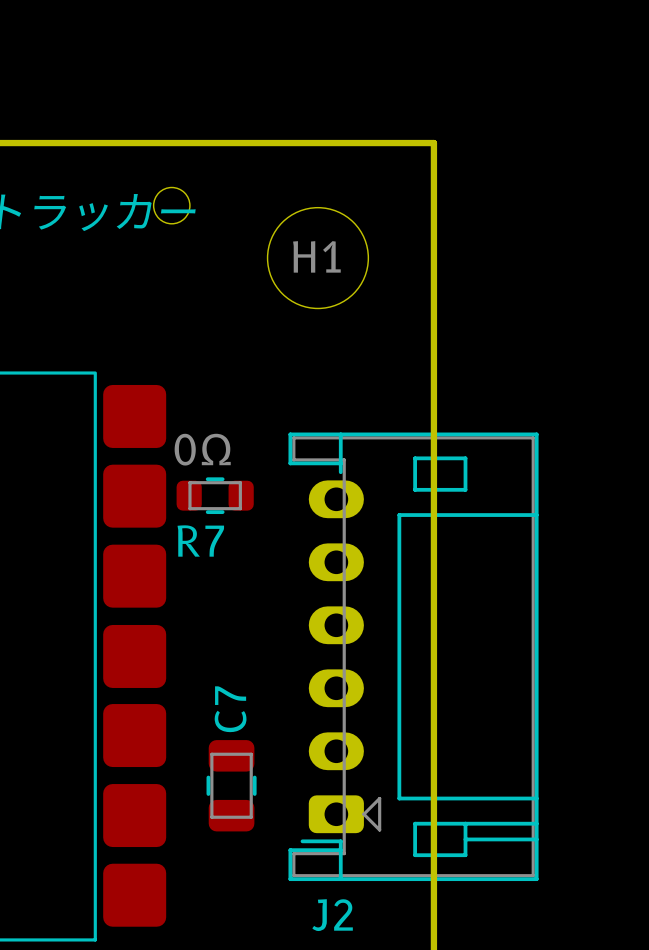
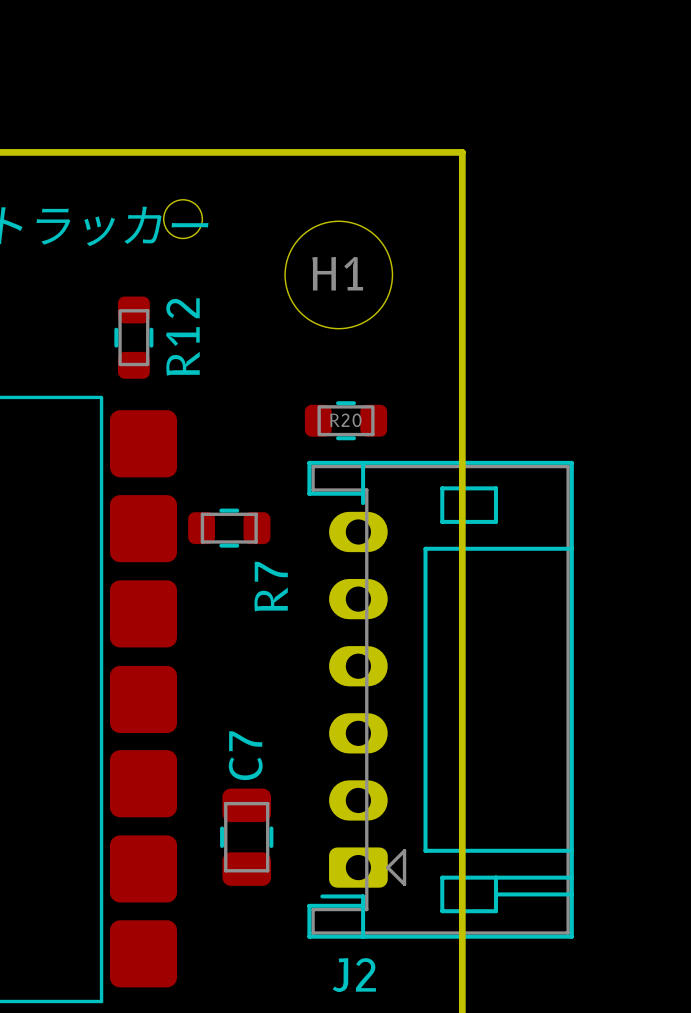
R12: none -> (133, 337)
R20: none -> (346, 420)
R7 value: 0Ω (202, 449) -> none
R7 name rotation: 0° (200, 541) -> 90° counterclockwise (271, 586)

